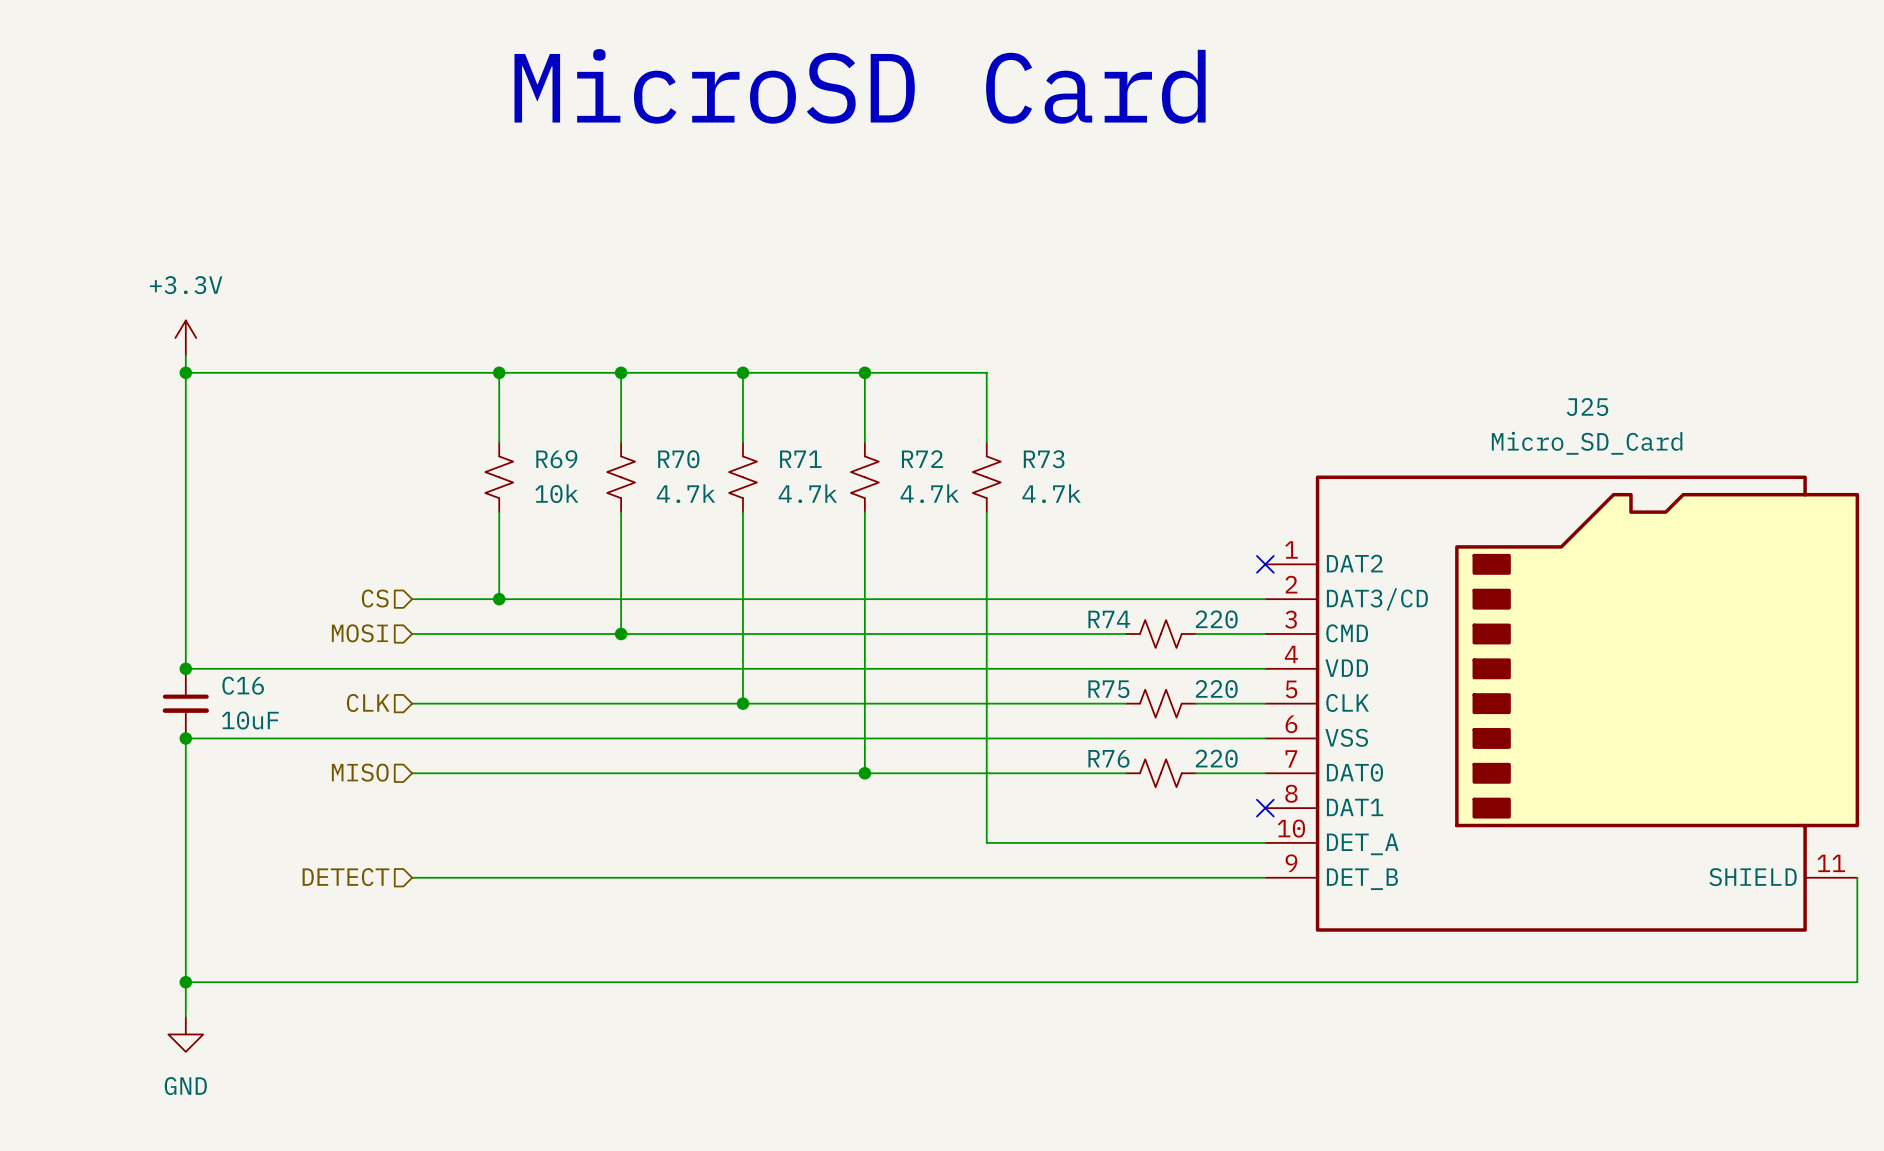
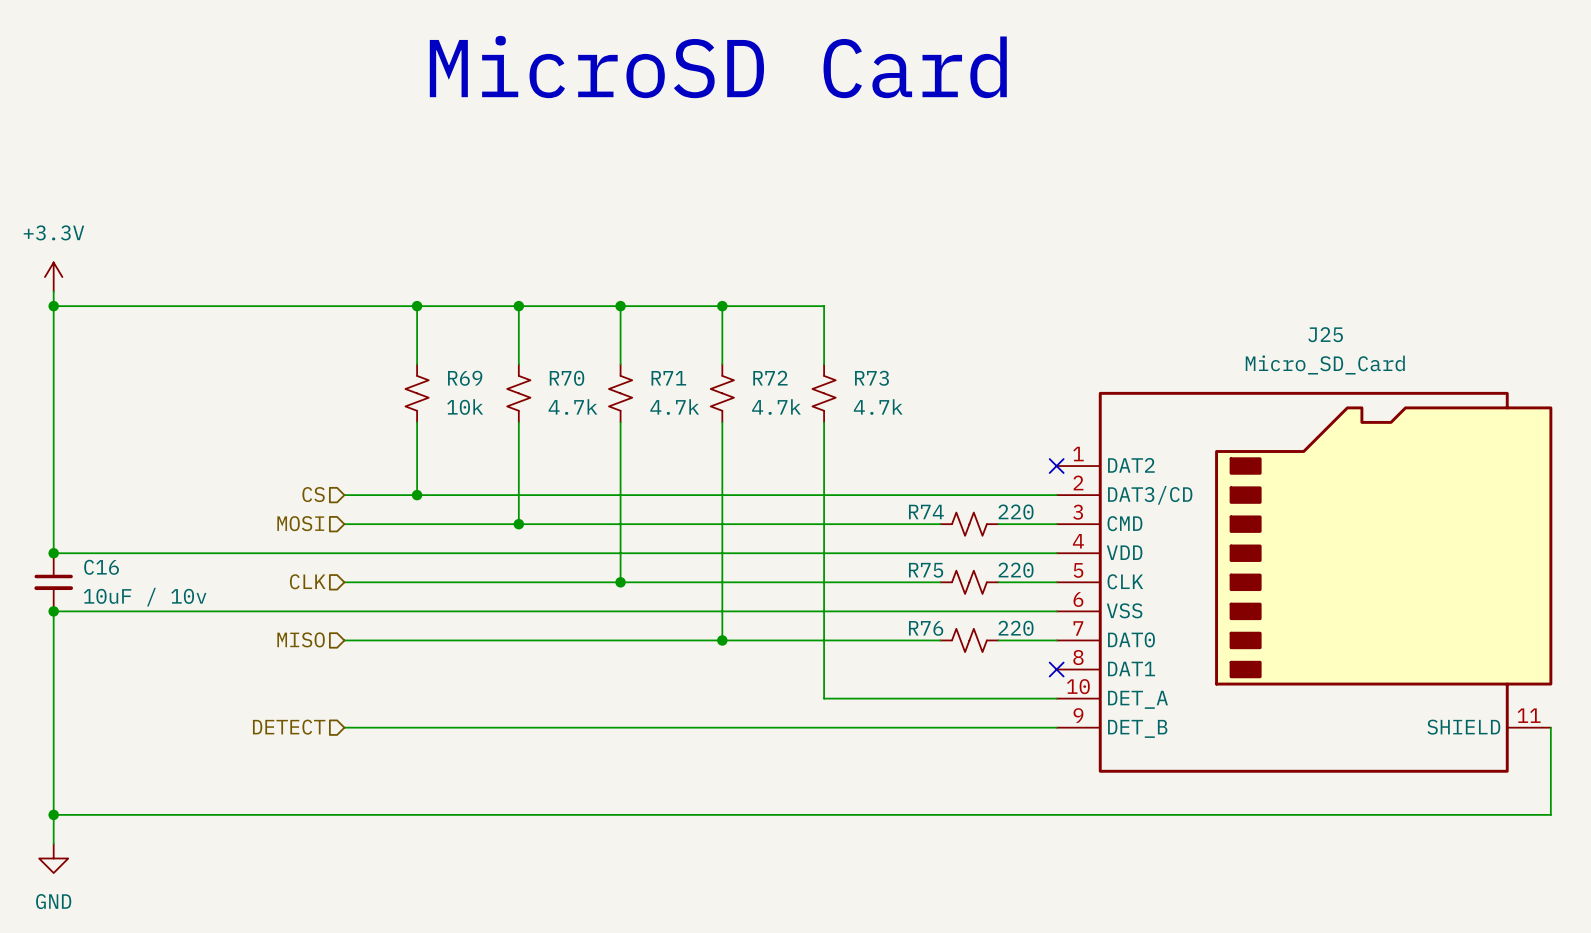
power symbol position: +3.3V (185, 338) -> +3.3V (53, 277)
wire: (185, 355) (185, 668) -> (53, 291) (53, 553) (155, 553)
wire: none -> (53, 306) (155, 306)
junction: none -> (53, 306)
junction: (185, 372) -> none
junction: none -> (53, 553)
junction: (185, 668) -> none
C16 position: (185, 703) -> (53, 582)
C16 value: 10uF (250, 720) -> 10uF / 10v (145, 597)
junction: none -> (53, 611)
wire: (185, 738) (185, 1017) -> (155, 611) (53, 611) (53, 843)
junction: (185, 738) -> none
wire: none -> (53, 814) (155, 814)
junction: none -> (53, 814)
junction: (185, 982) -> none
power symbol position: GND (185, 1034) -> GND (53, 858)

